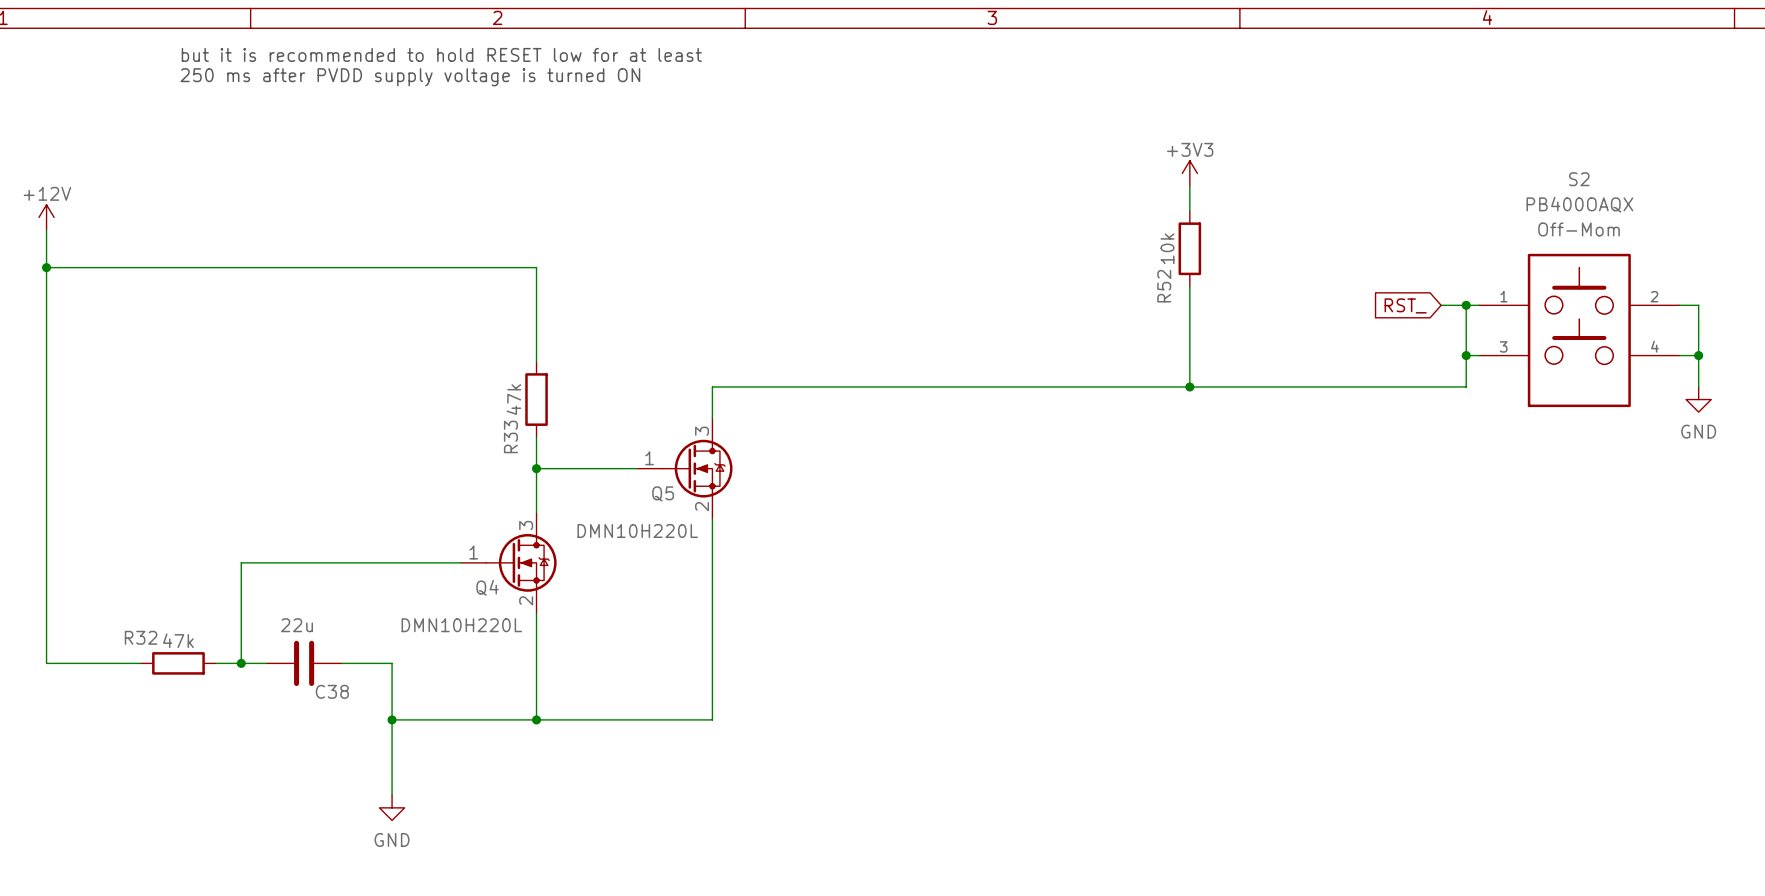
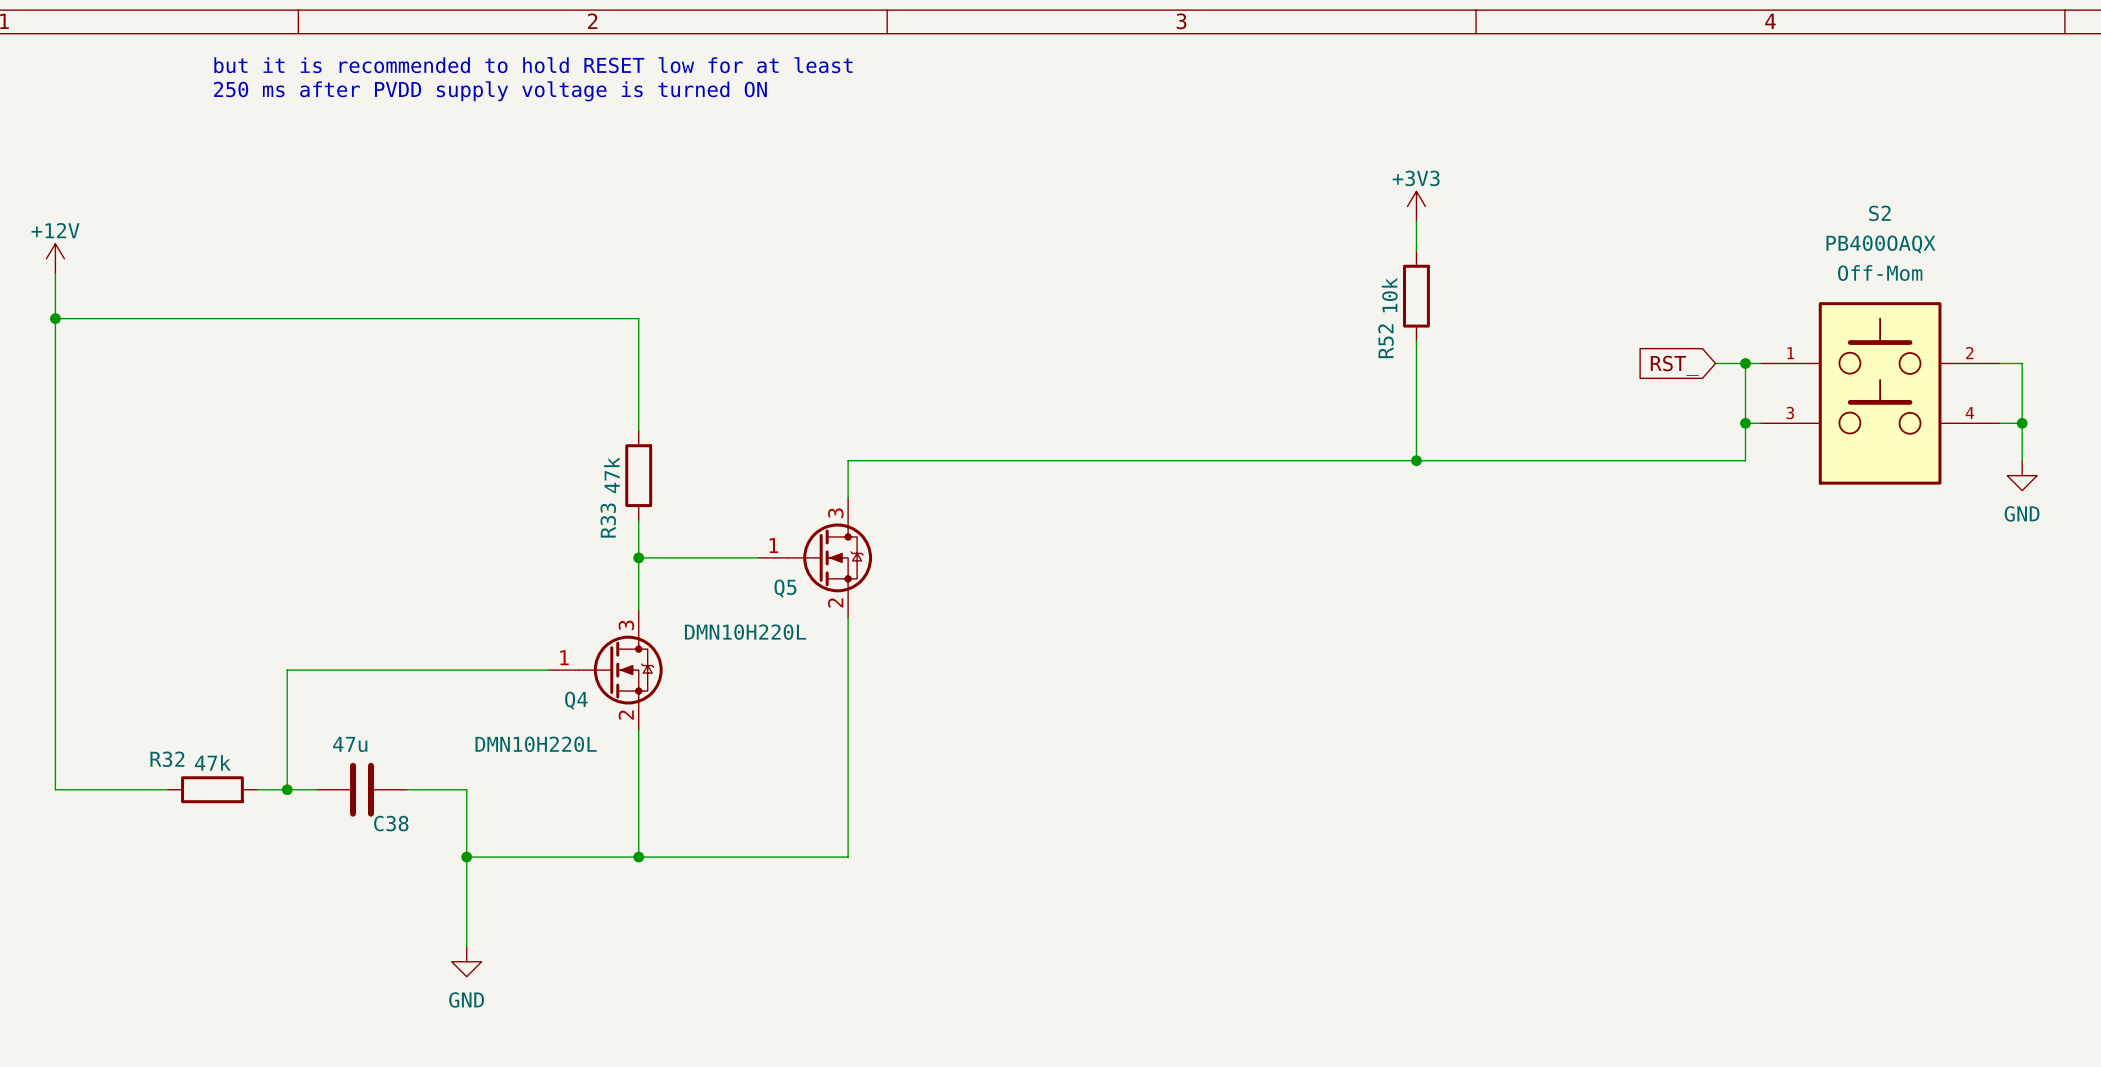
C38 value: 22u (297, 625) -> 47u (350, 744)

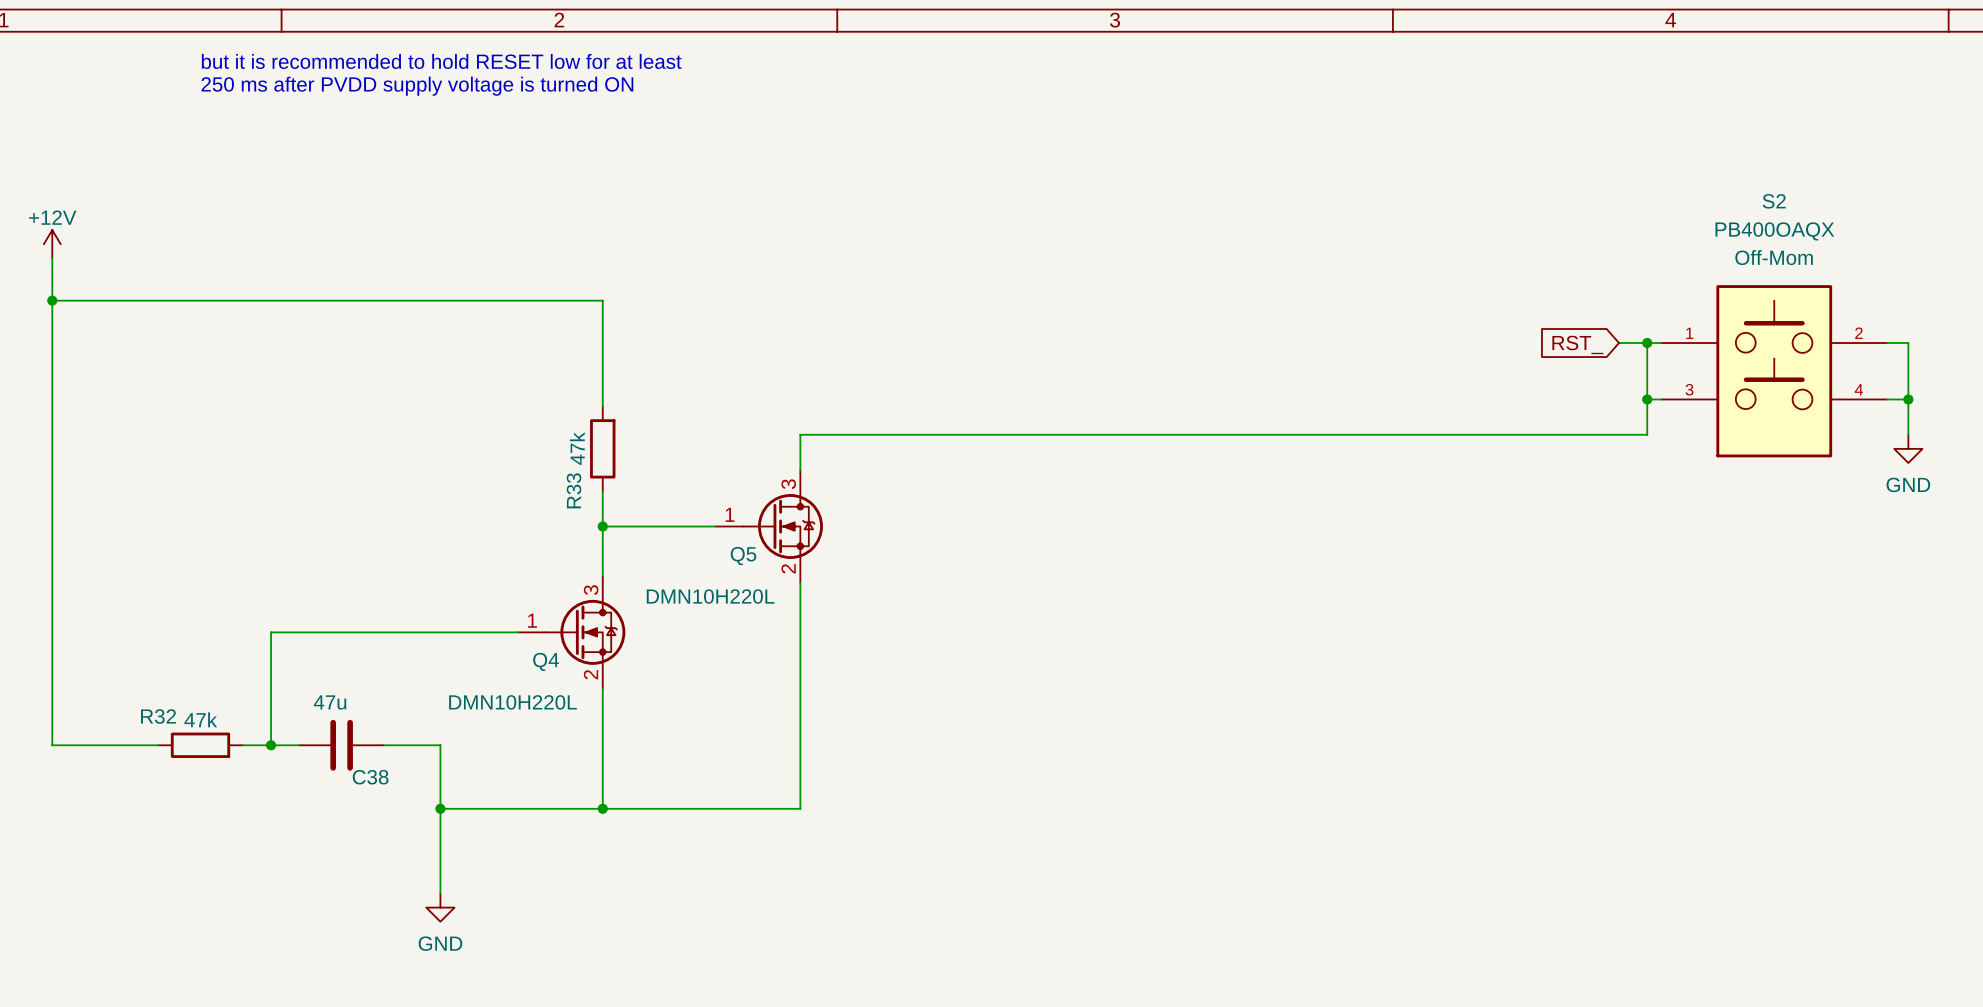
power symbol: +3V3 (1416, 206) -> none
wire: (1416, 221) (1416, 251) -> none
R52: 10k (1416, 296) -> none
wire: (1416, 341) (1416, 460) -> none
junction: (1416, 460) -> none

